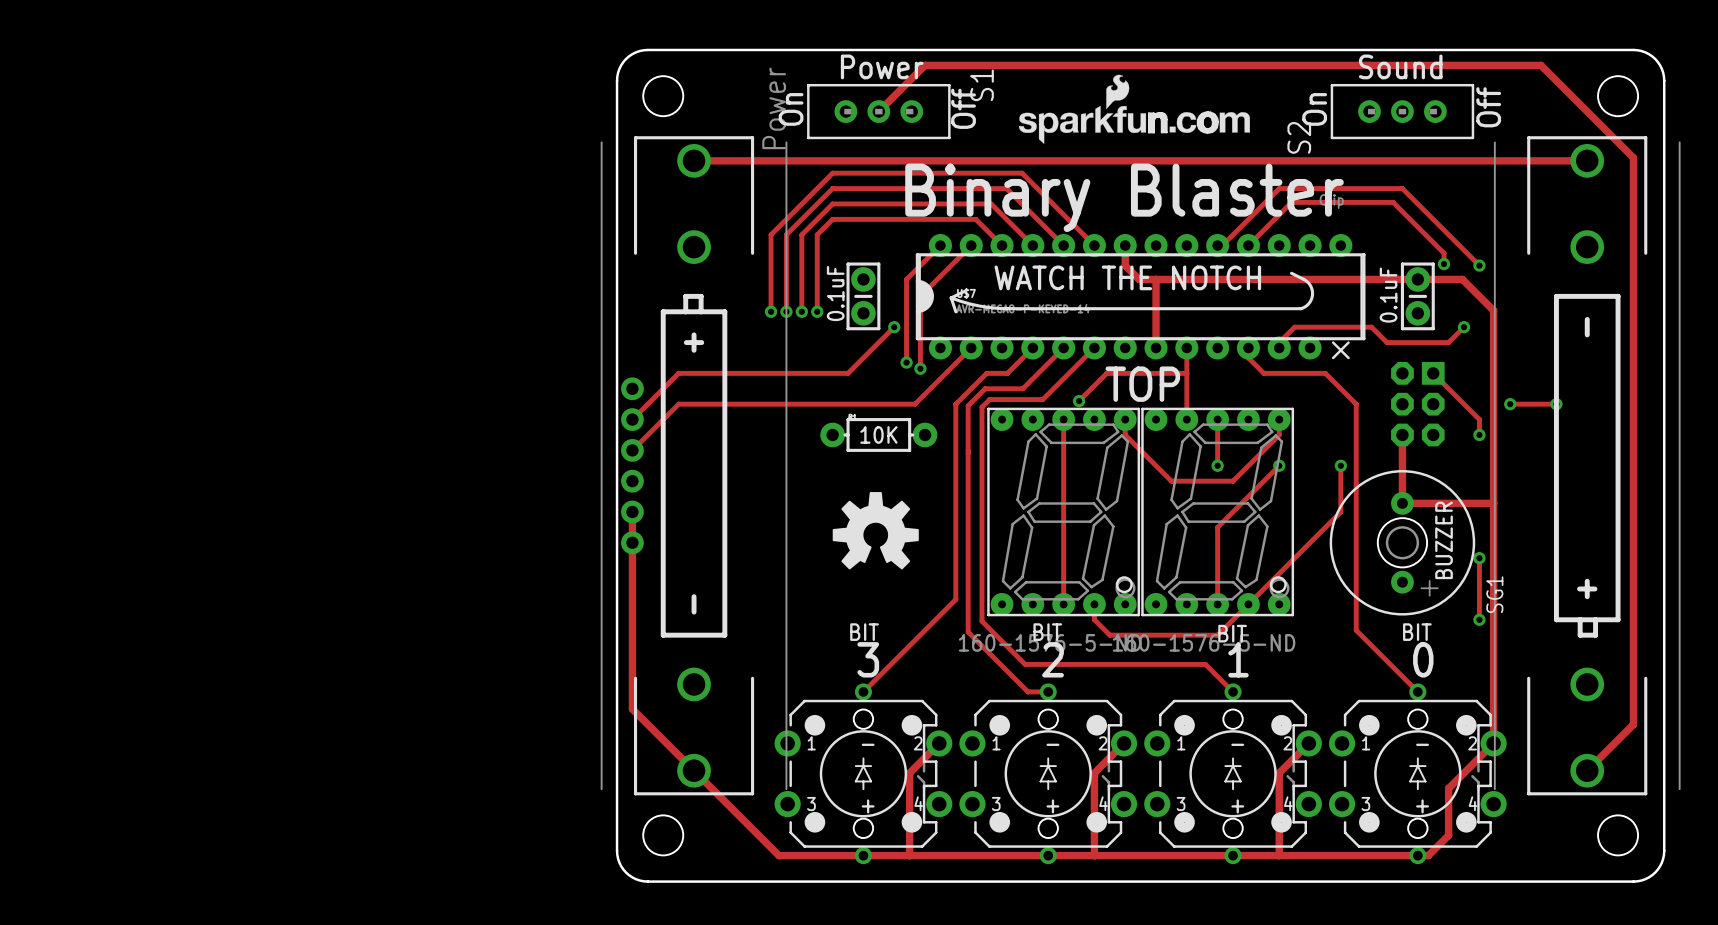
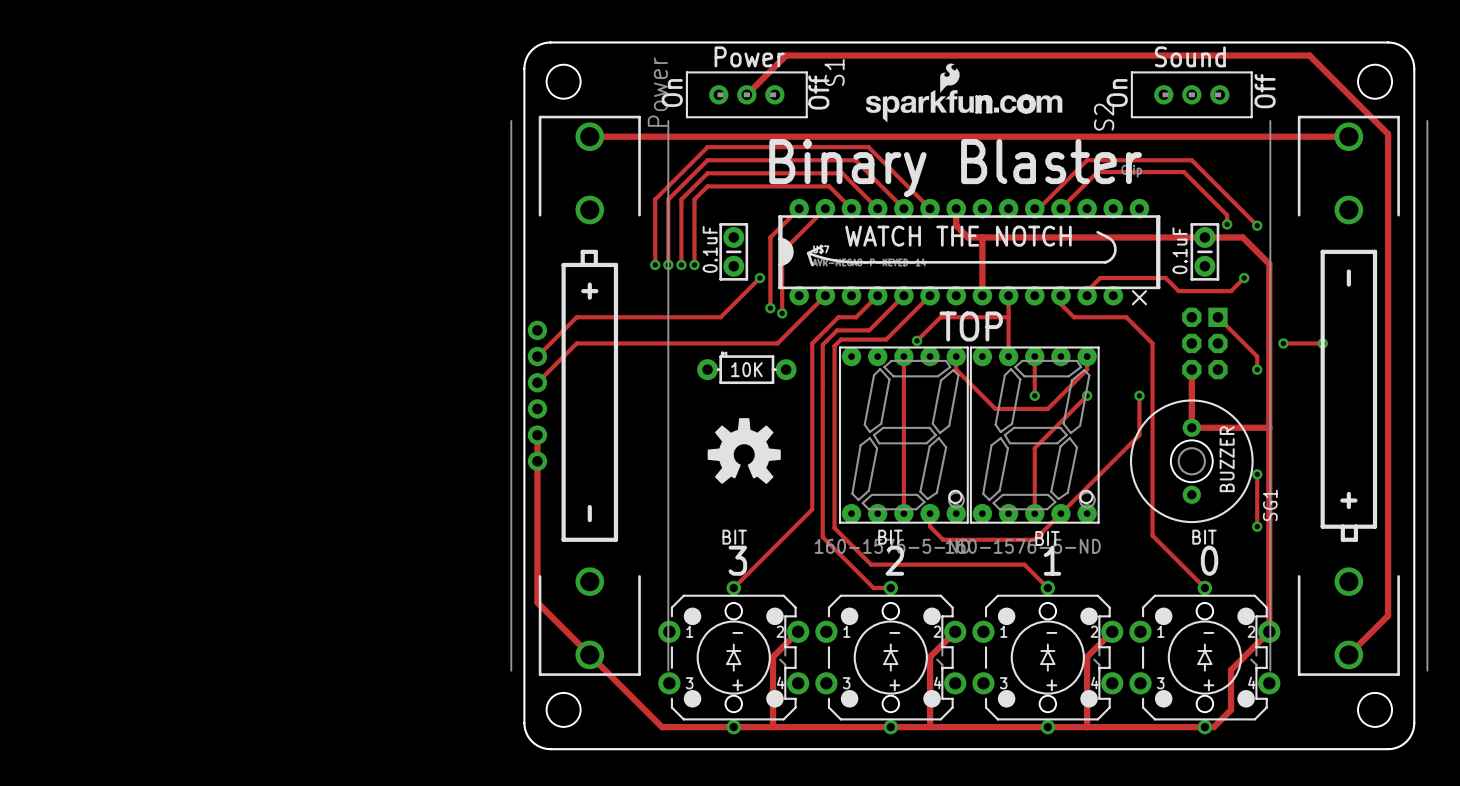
SG1 footprint: [1329, 470, 1476, 616] -> [1129, 399, 1254, 524]

